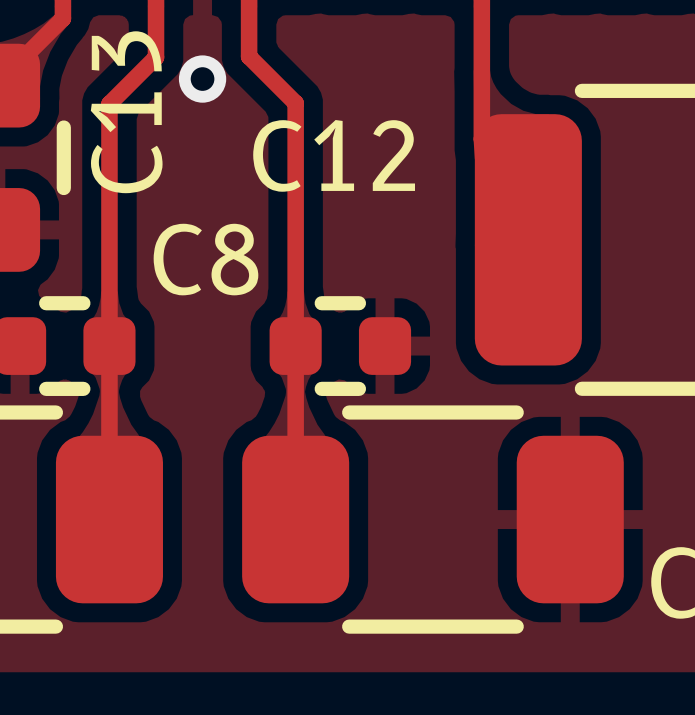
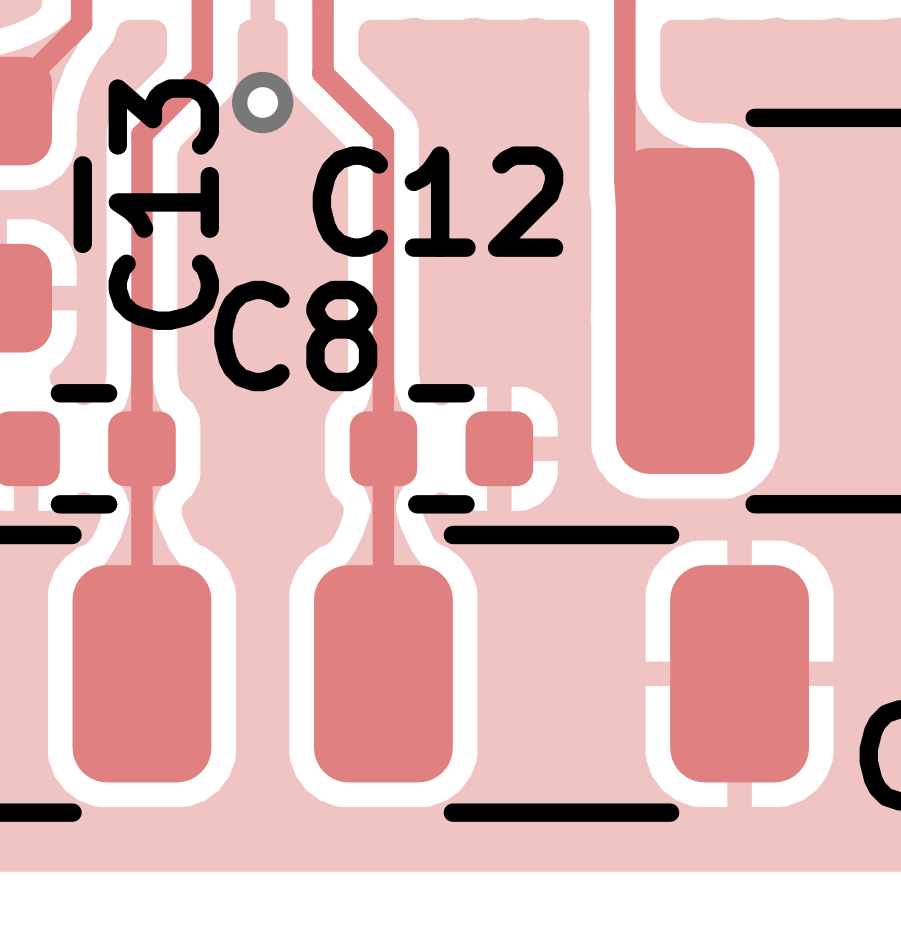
C13 name position: C13 (126, 112) -> C13 (163, 204)

